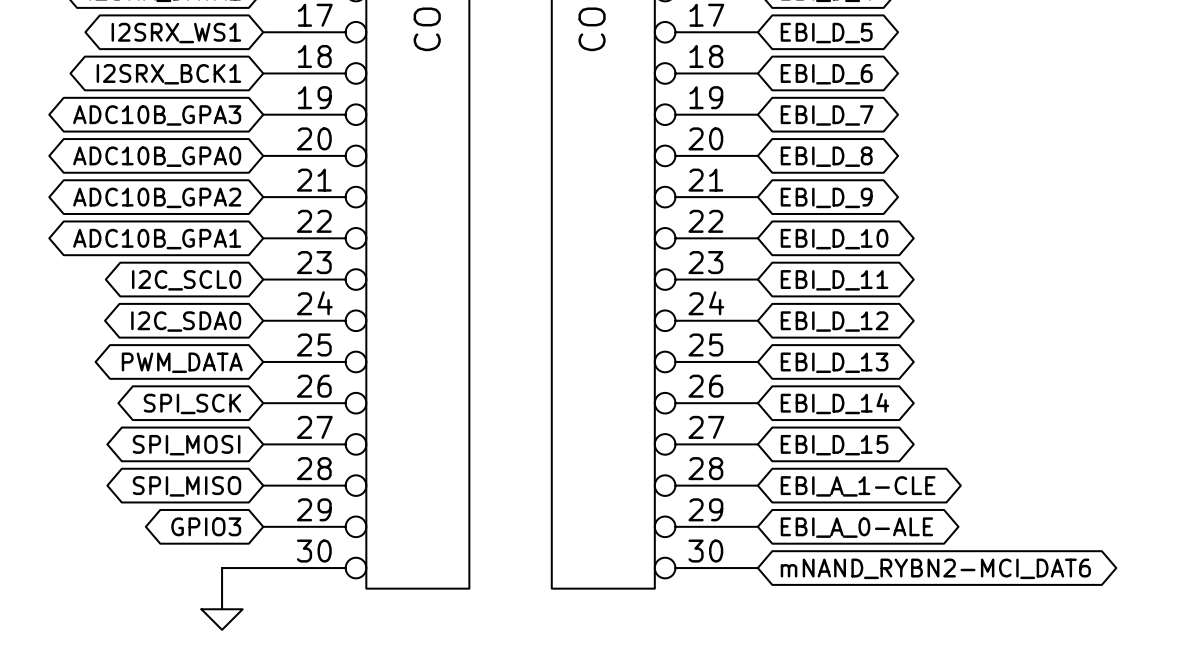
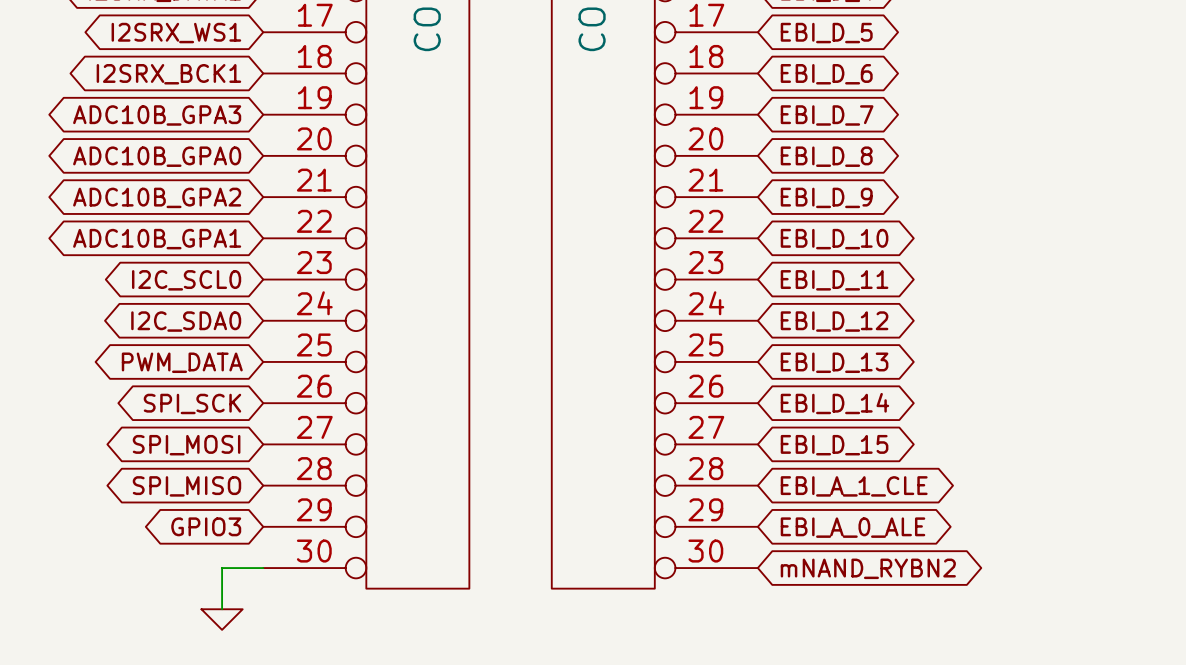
global label: EBI_A_1-CLE (858, 486) -> EBI_A_1_CLE (854, 486)
global label: EBI_A_0-ALE (856, 527) -> EBI_A_0_ALE (853, 527)
global label: mNAND_RYBN2-MCI_DAT6 (935, 568) -> mNAND_RYBN2 (868, 568)

